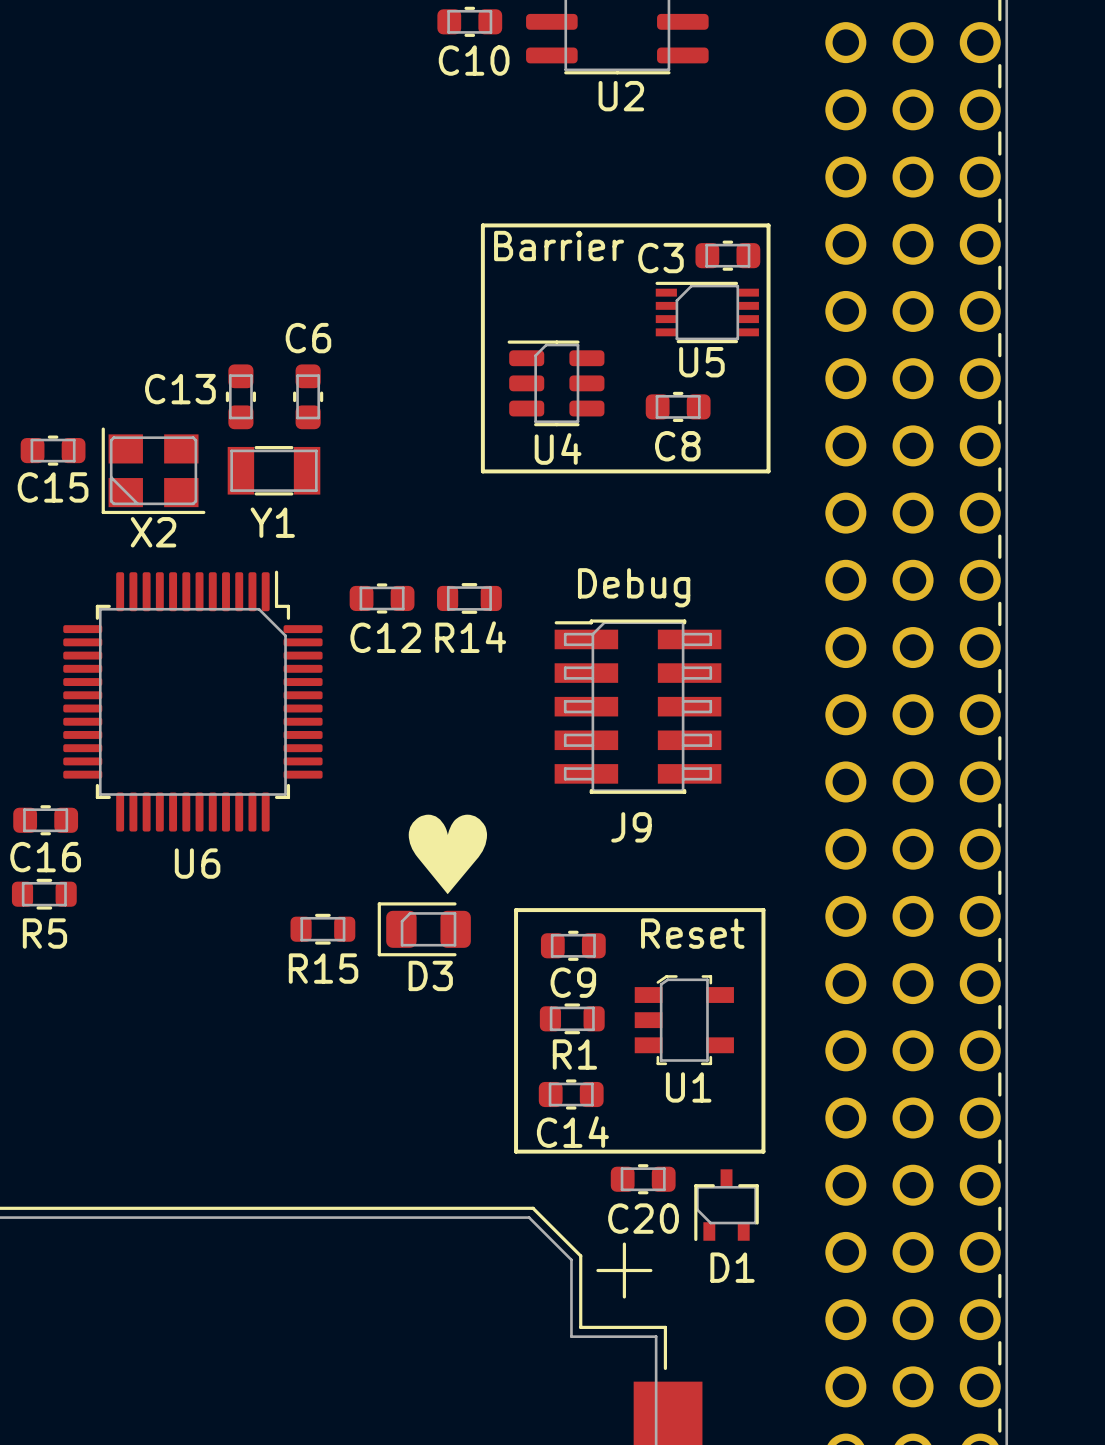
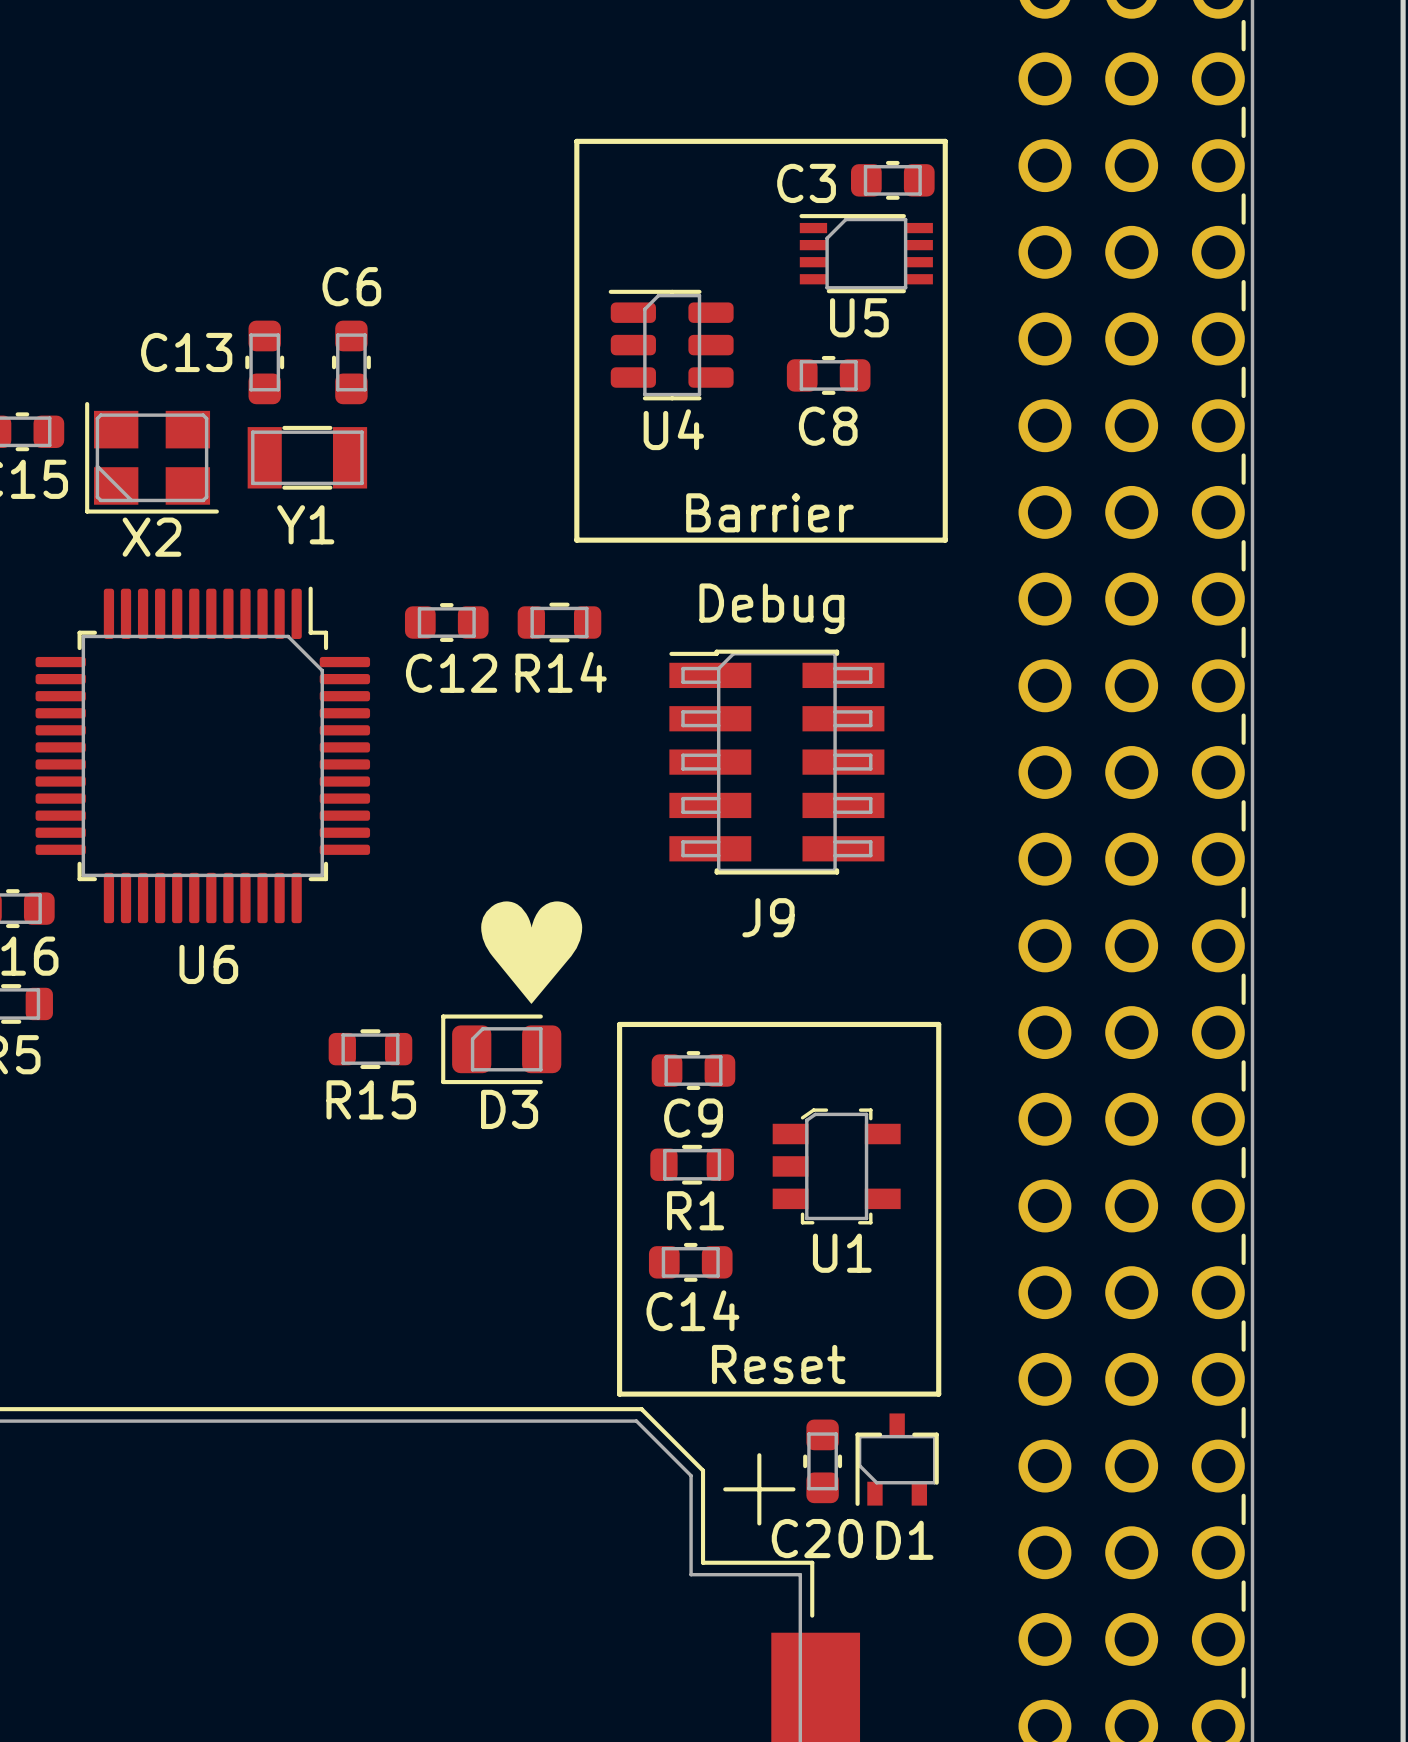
text position: Barrier (559, 246) -> Barrier (769, 512)
line: (482, 471) (768, 471) -> (576, 458) (576, 540) (945, 540) (945, 458)
text position: Reset (692, 933) -> Reset (778, 1364)
line: (516, 1151) (763, 1151) -> (619, 1336) (619, 1394) (938, 1394) (938, 1336)
C20 rotation: 0° (643, 1179) -> 90° clockwise (822, 1461)
C20 position: (643, 1179) -> (822, 1461)
D1 position: (726, 1205) -> (897, 1459)

